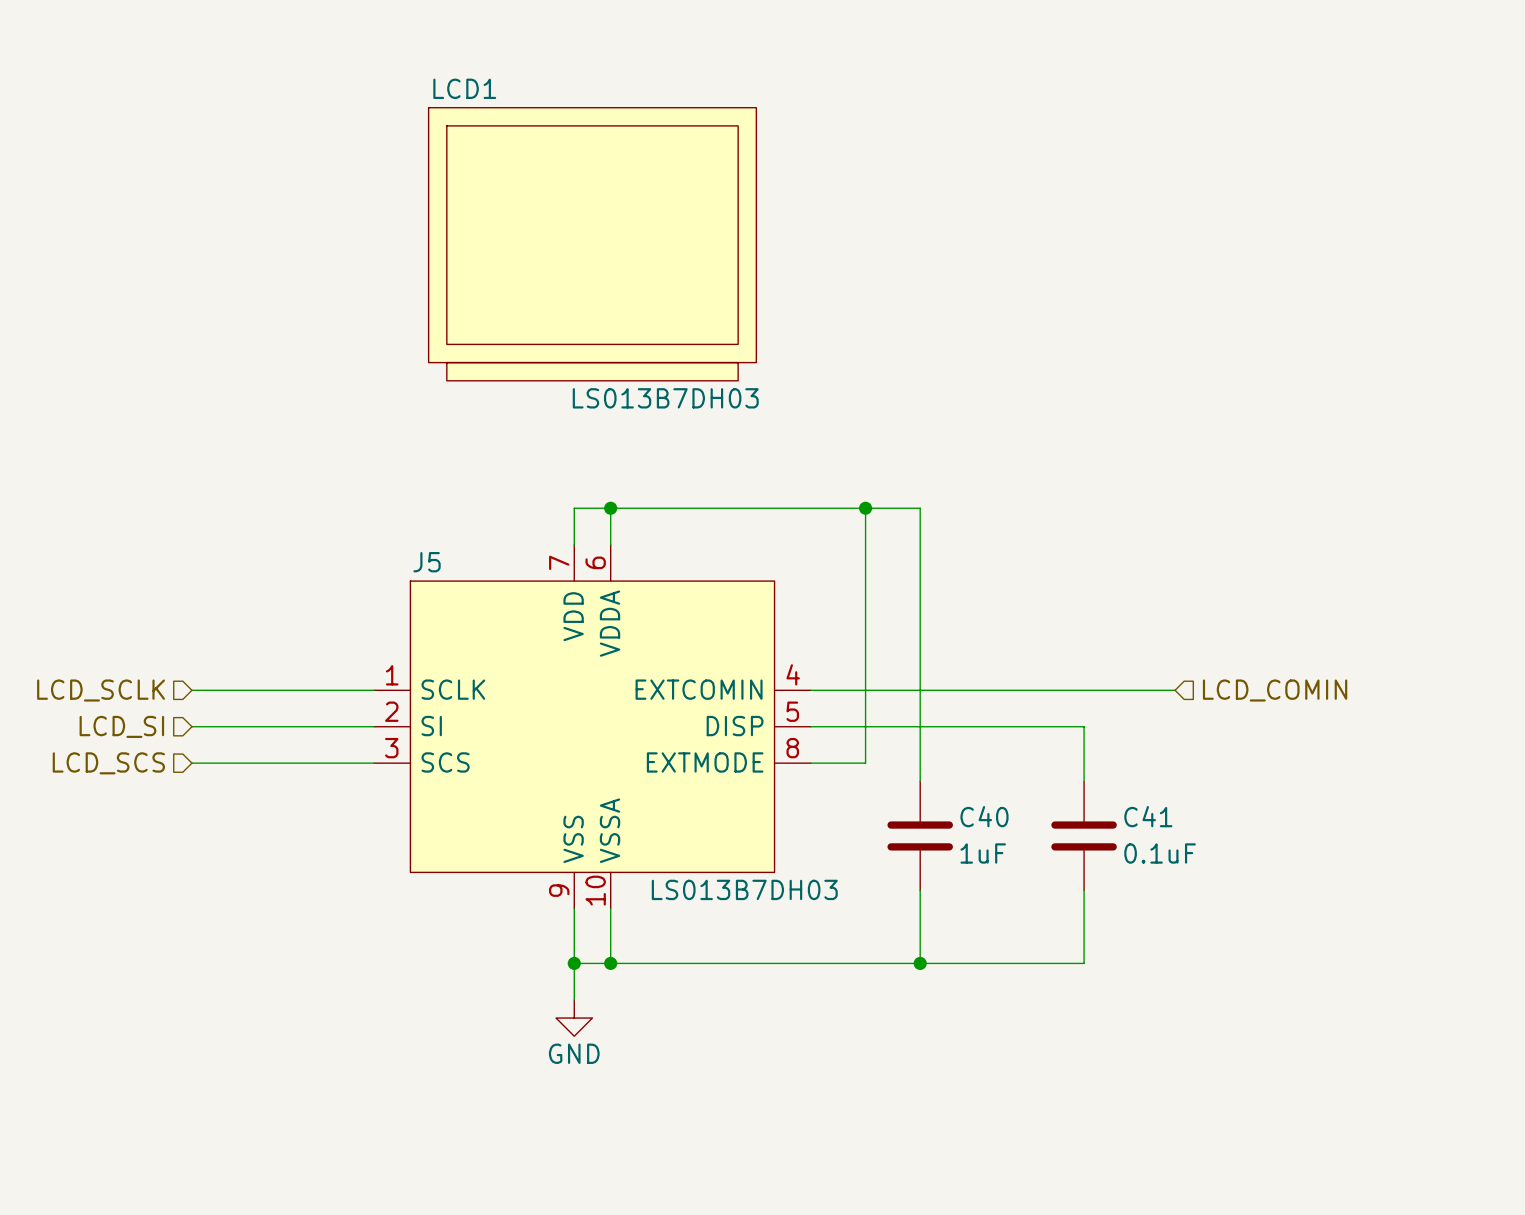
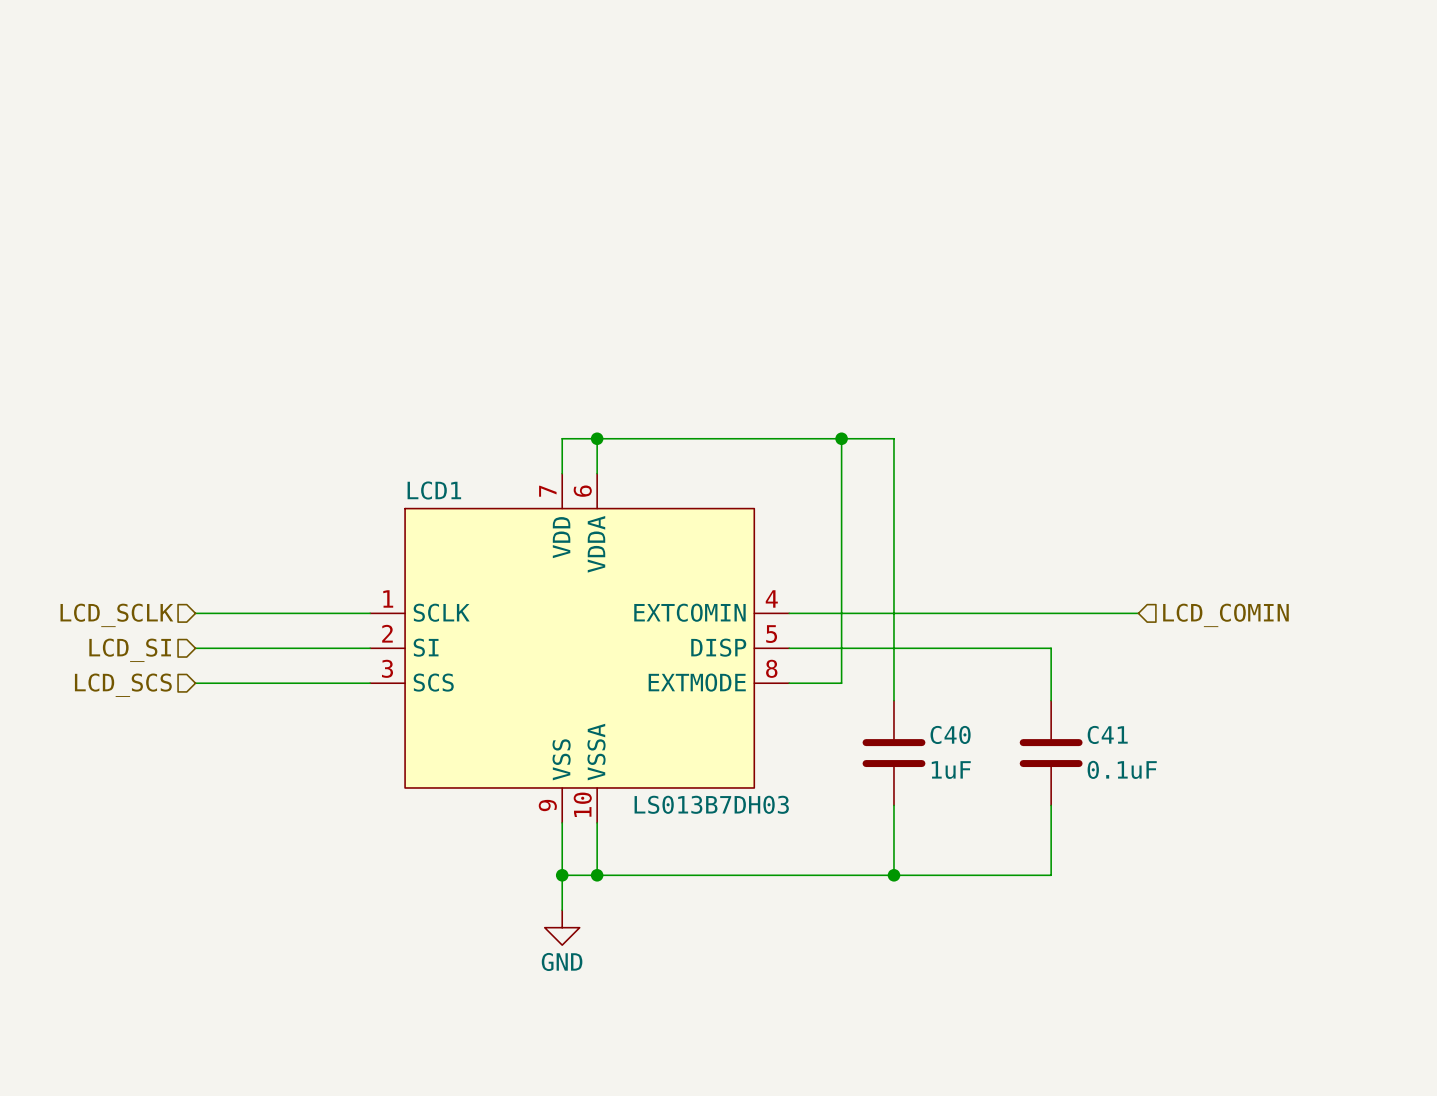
LCD1: LS013B7DH03 (592, 244) -> none
J5 name: J5 (427, 562) -> LCD1 (434, 490)

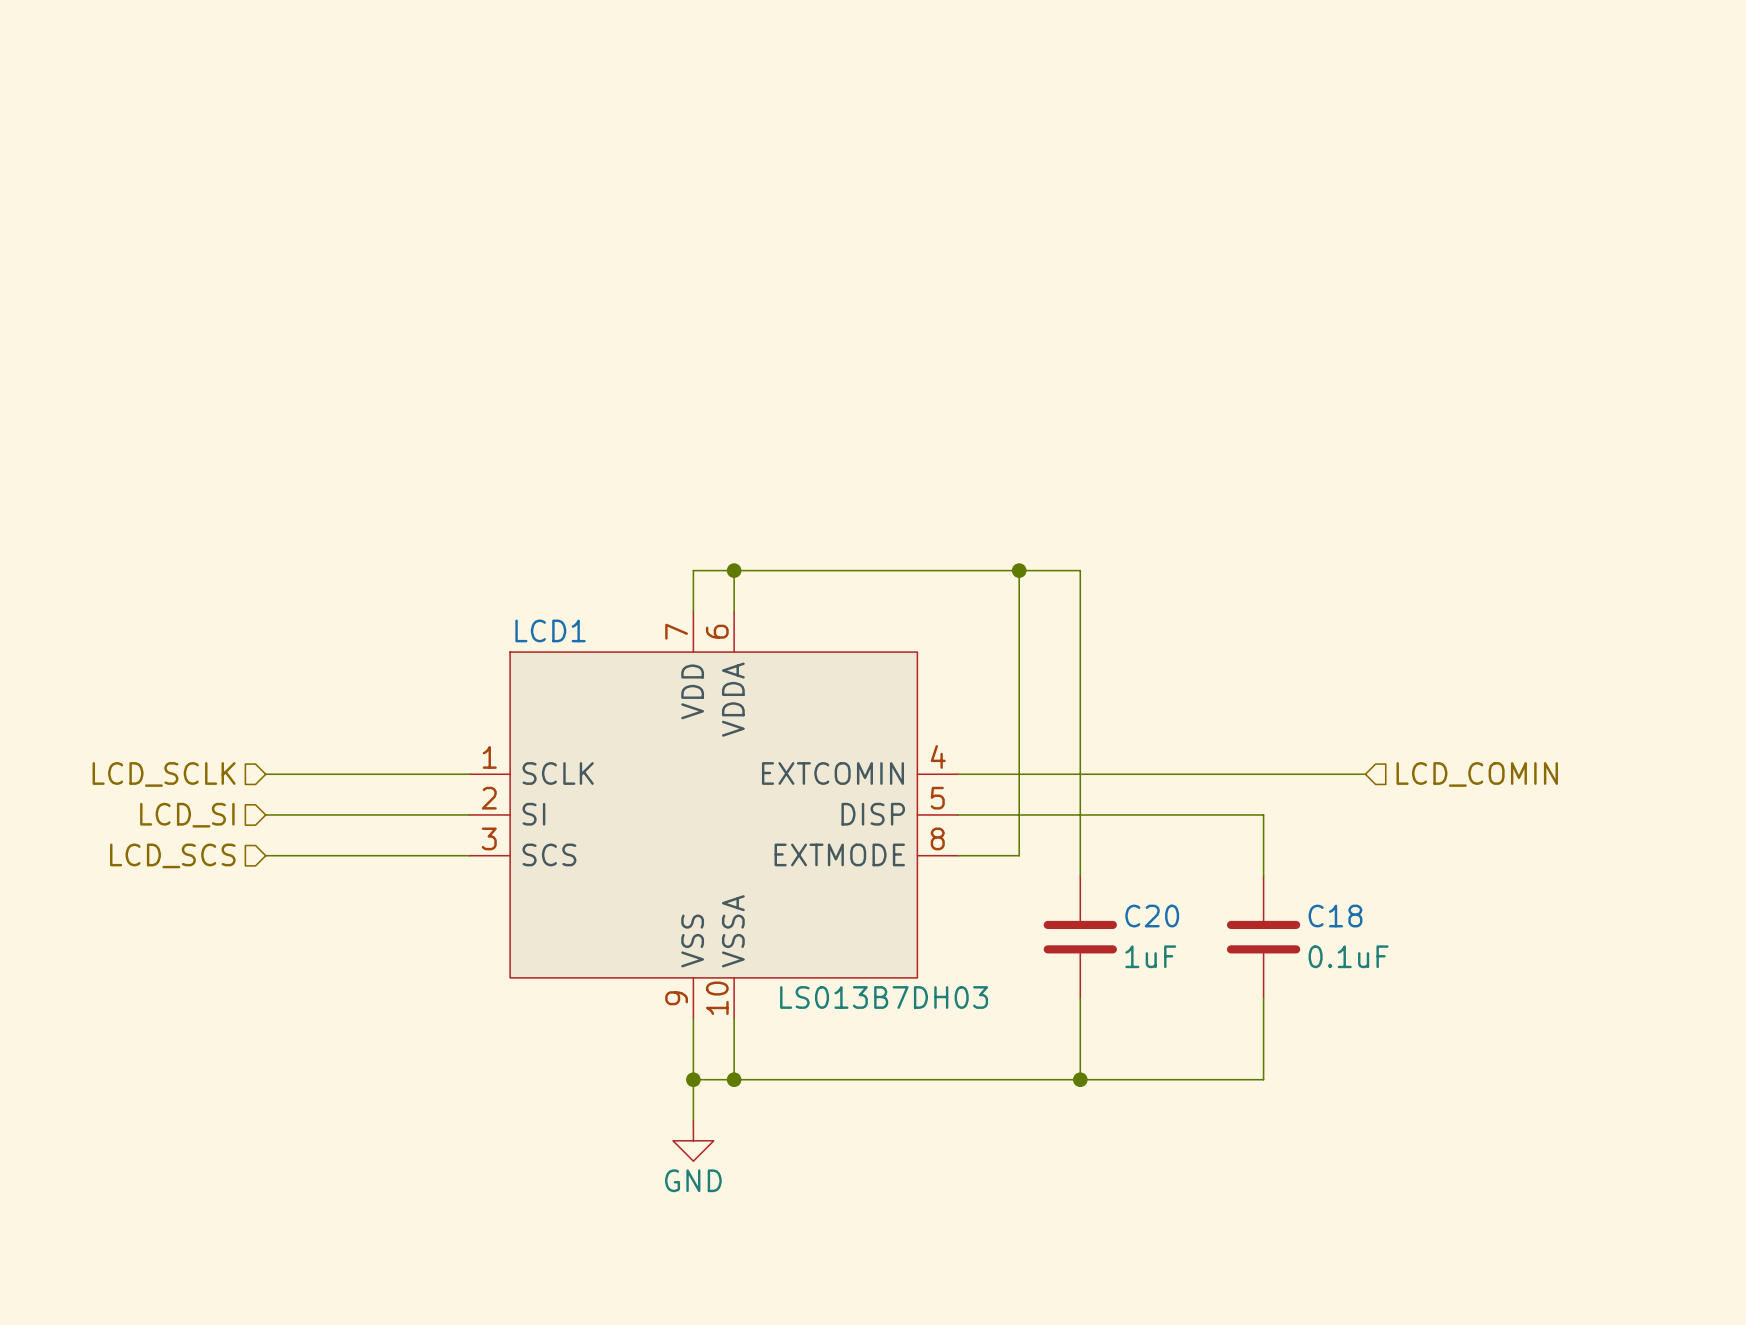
C40 name: C40 (950, 734) -> C20 (1152, 916)
C41 name: C41 (1107, 734) -> C18 (1335, 916)

